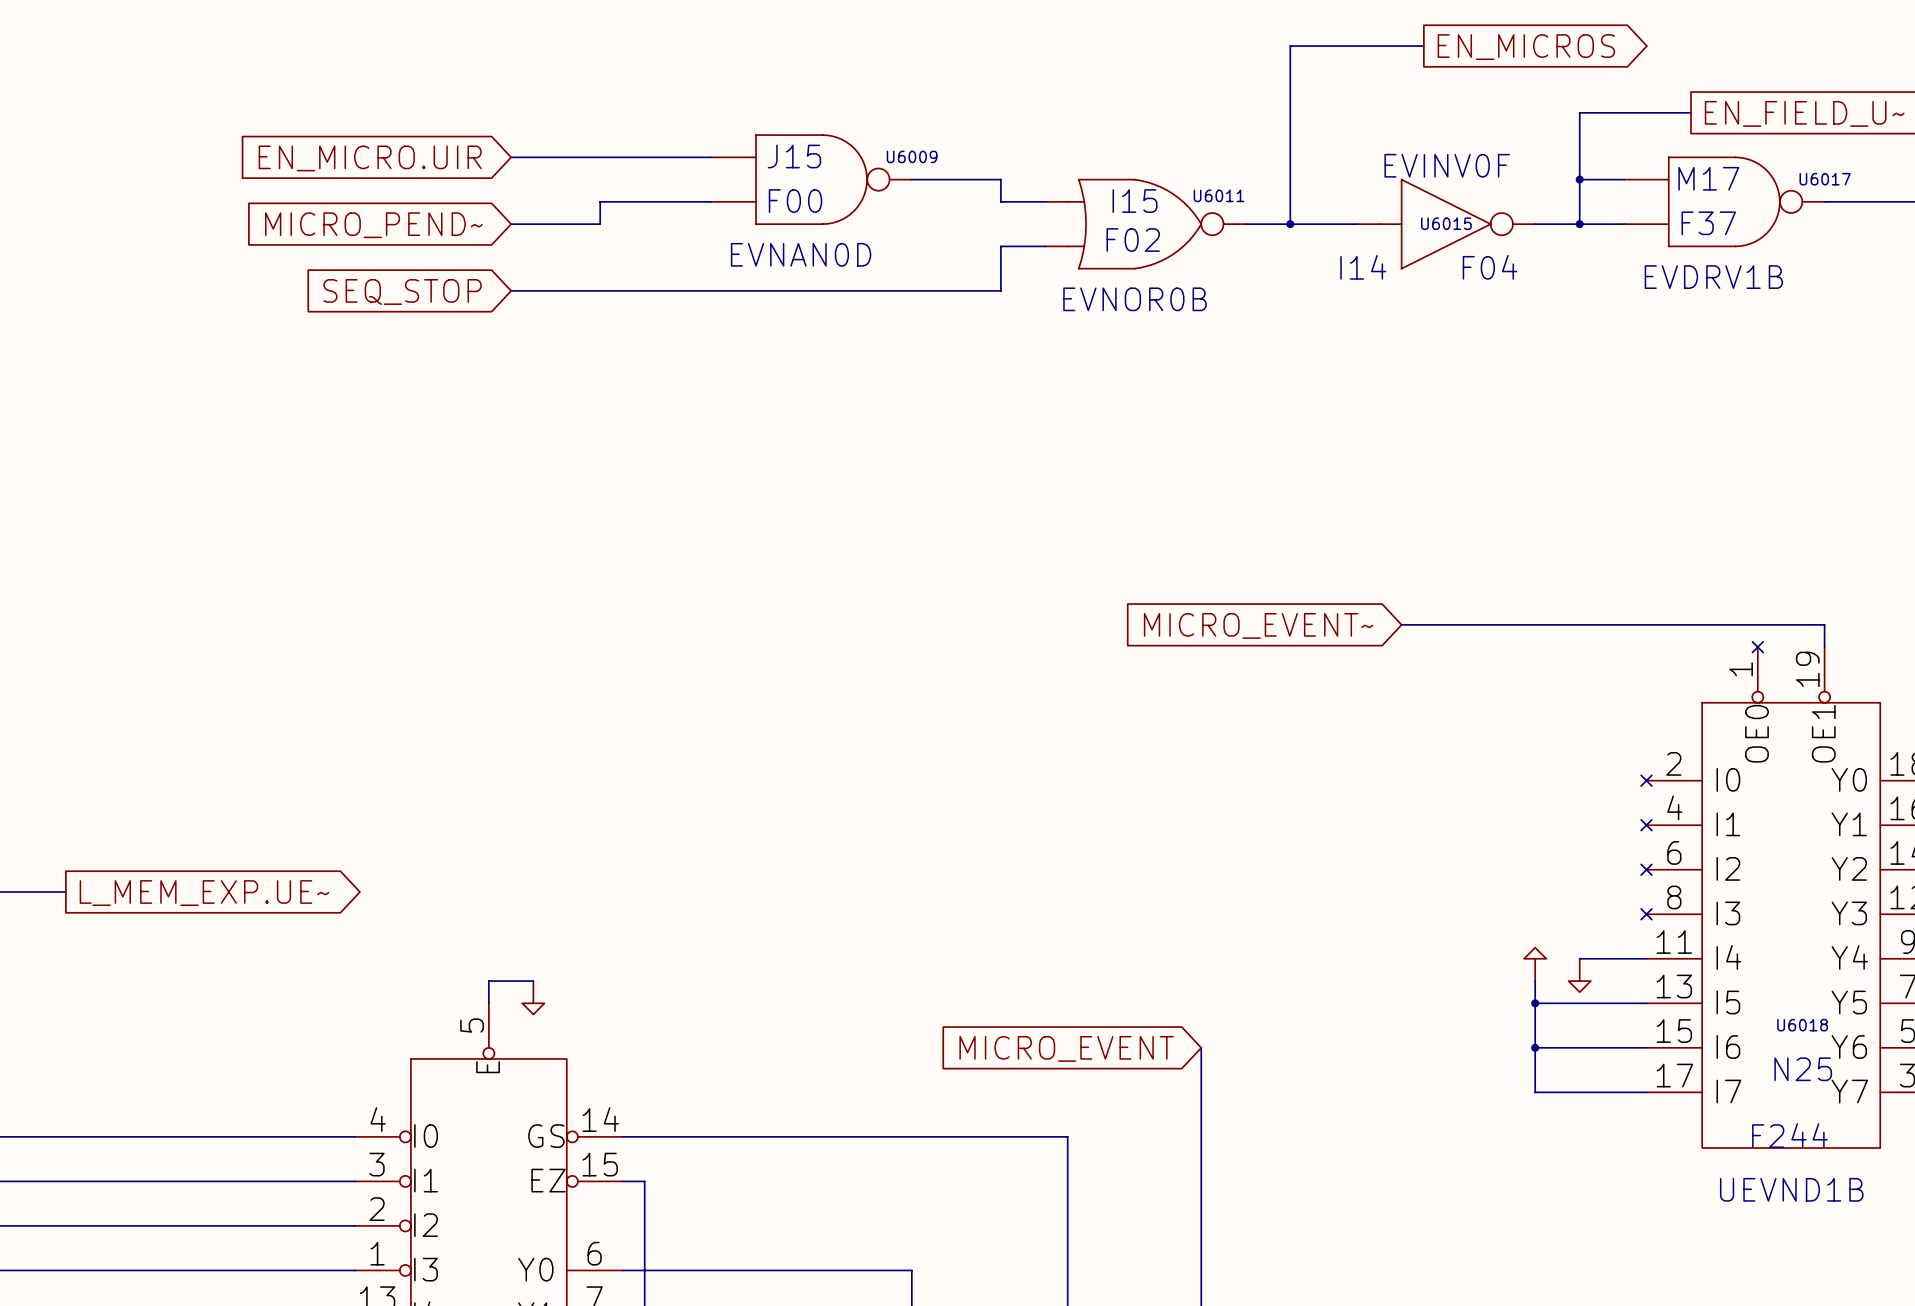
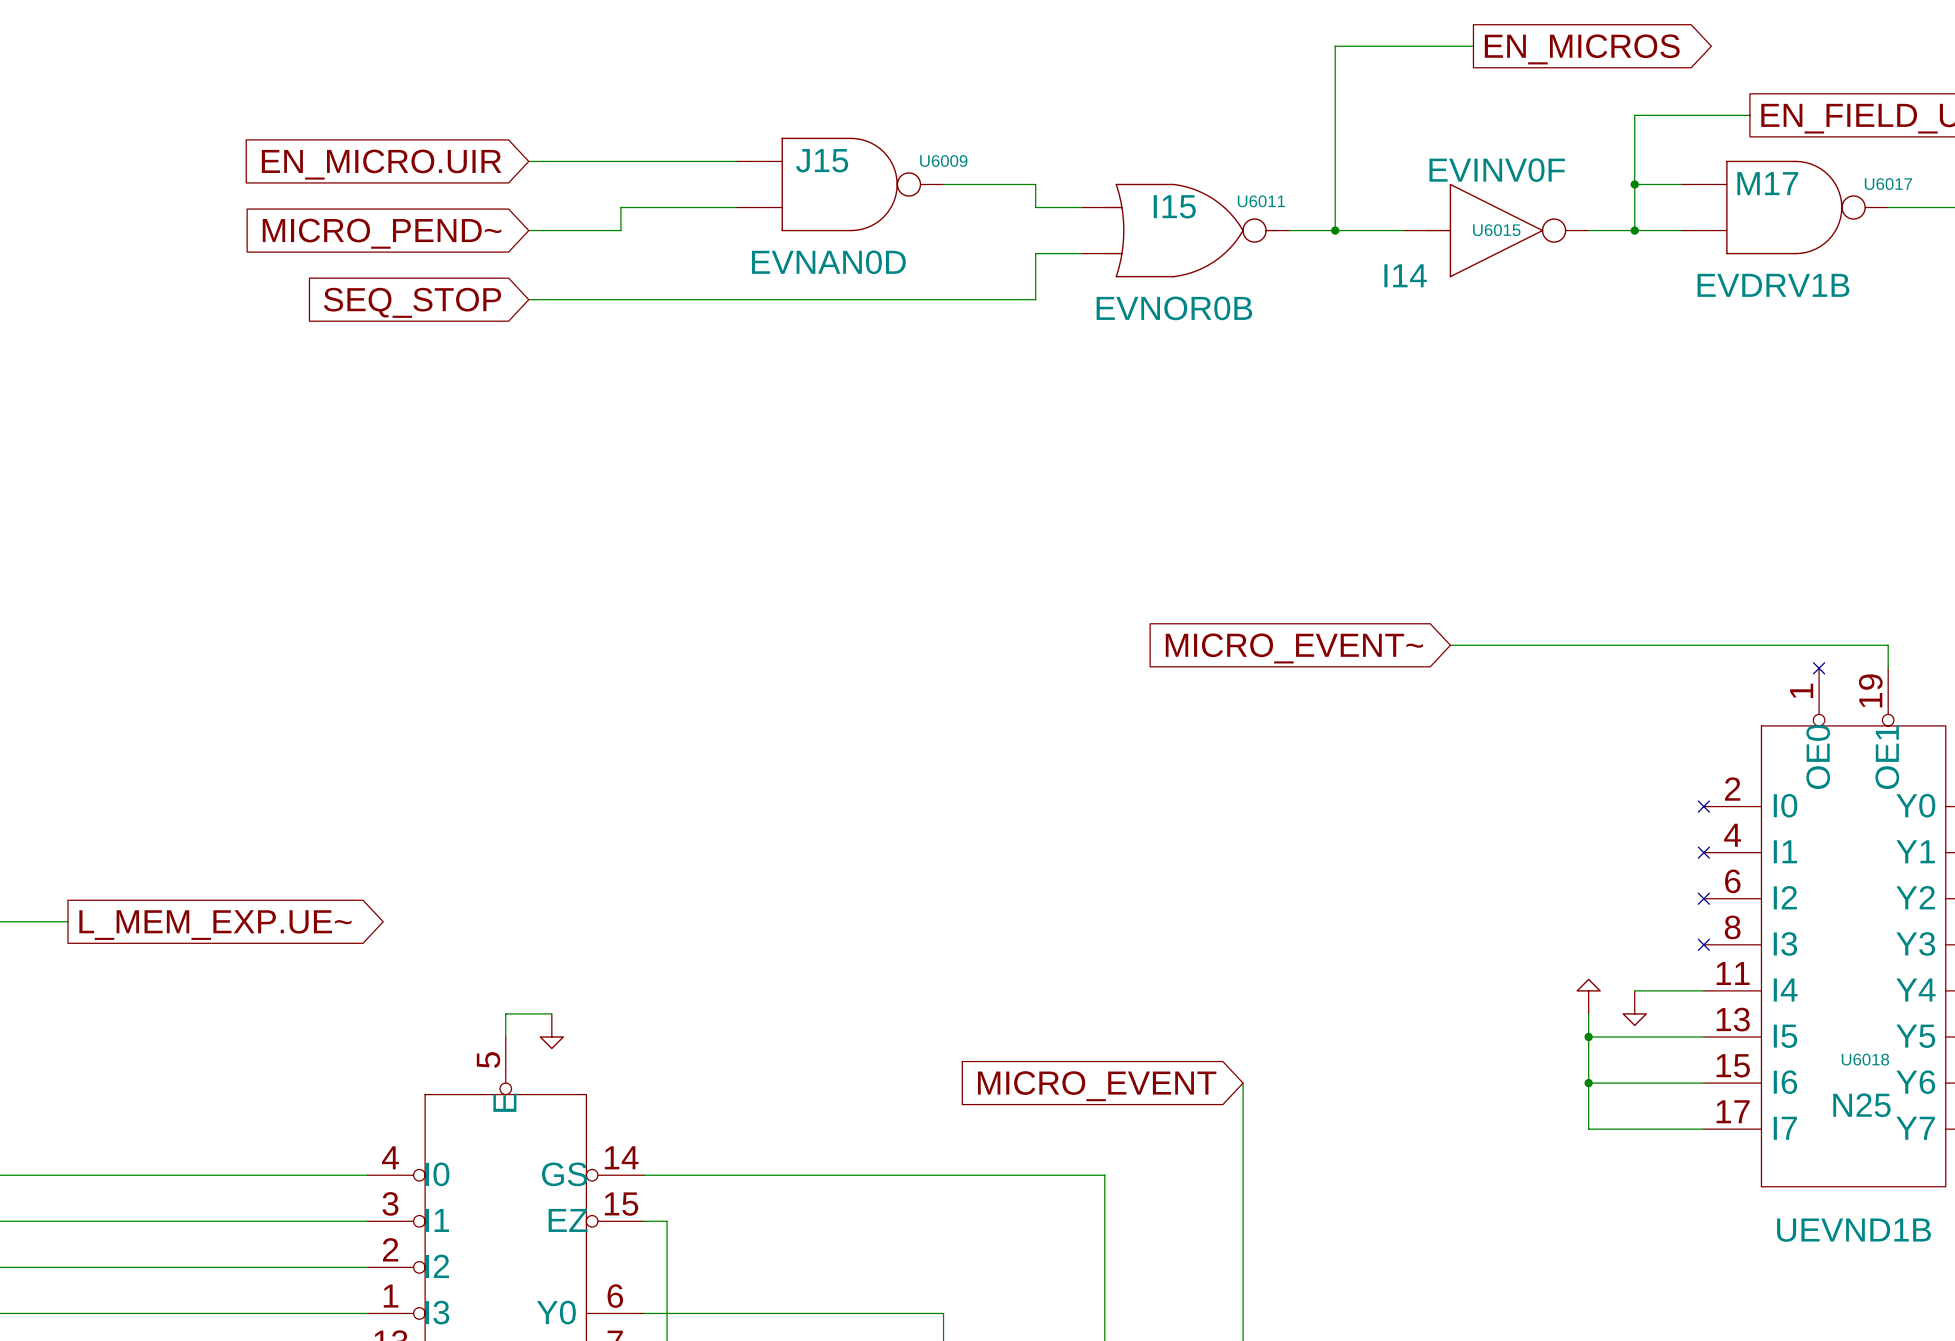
U6009 value: F00 (795, 201) -> none
U6017 value: F37 (1708, 223) -> none
U6011 value: F02 (1133, 240) -> none
U6015 value: F04 (1489, 267) -> none
U6018 value: F244 (1789, 1135) -> none

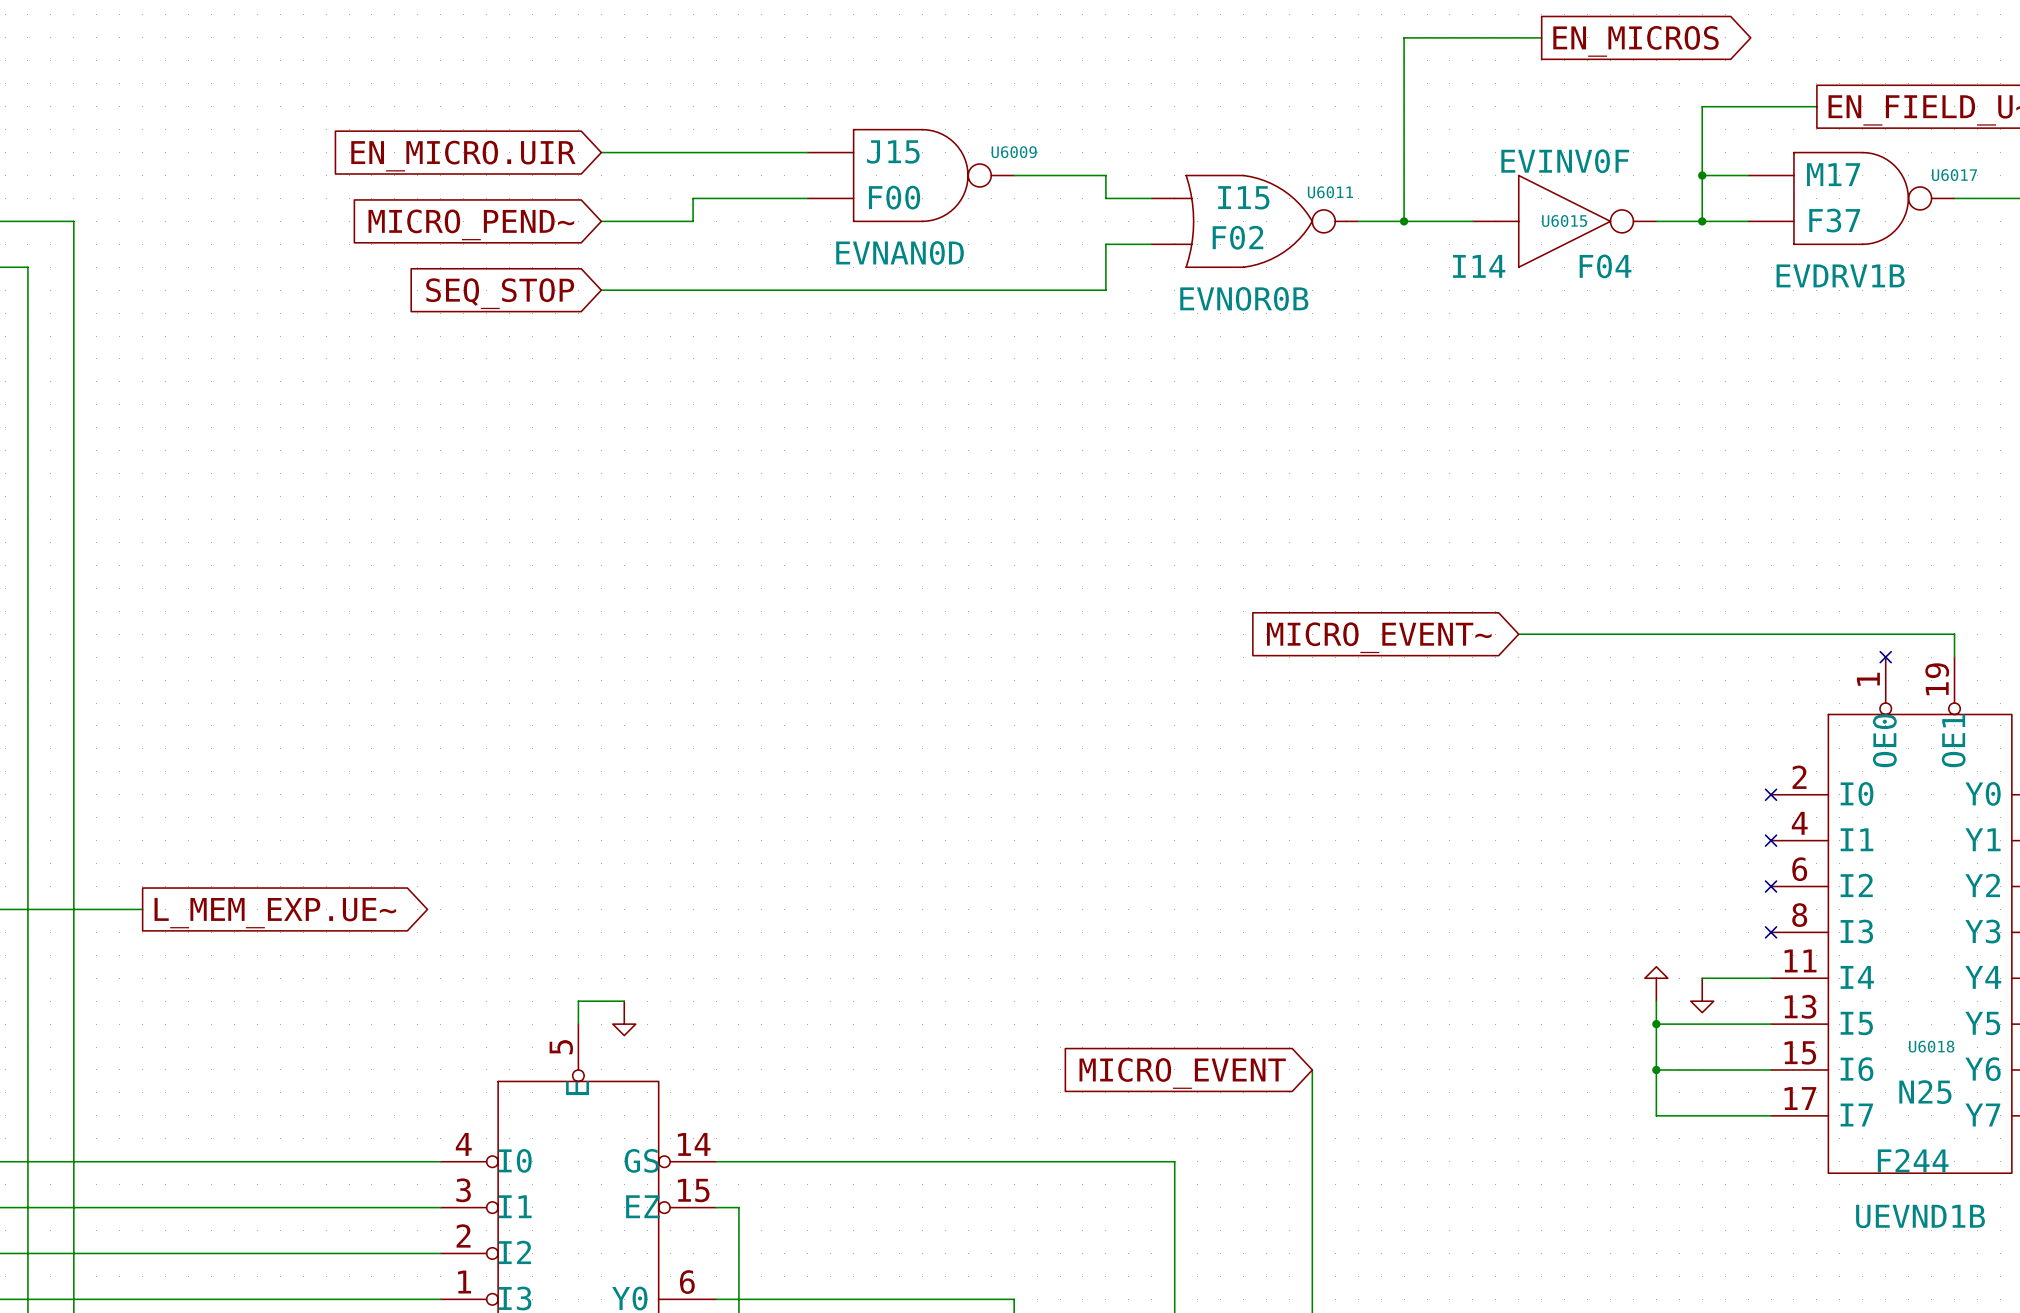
U6009 value: none -> F00 (894, 197)
U6017 value: none -> F37 (1834, 220)
U6011 value: none -> F02 (1237, 237)
U6015 value: none -> F04 (1605, 266)
U6018 value: none -> F244 (1913, 1160)

